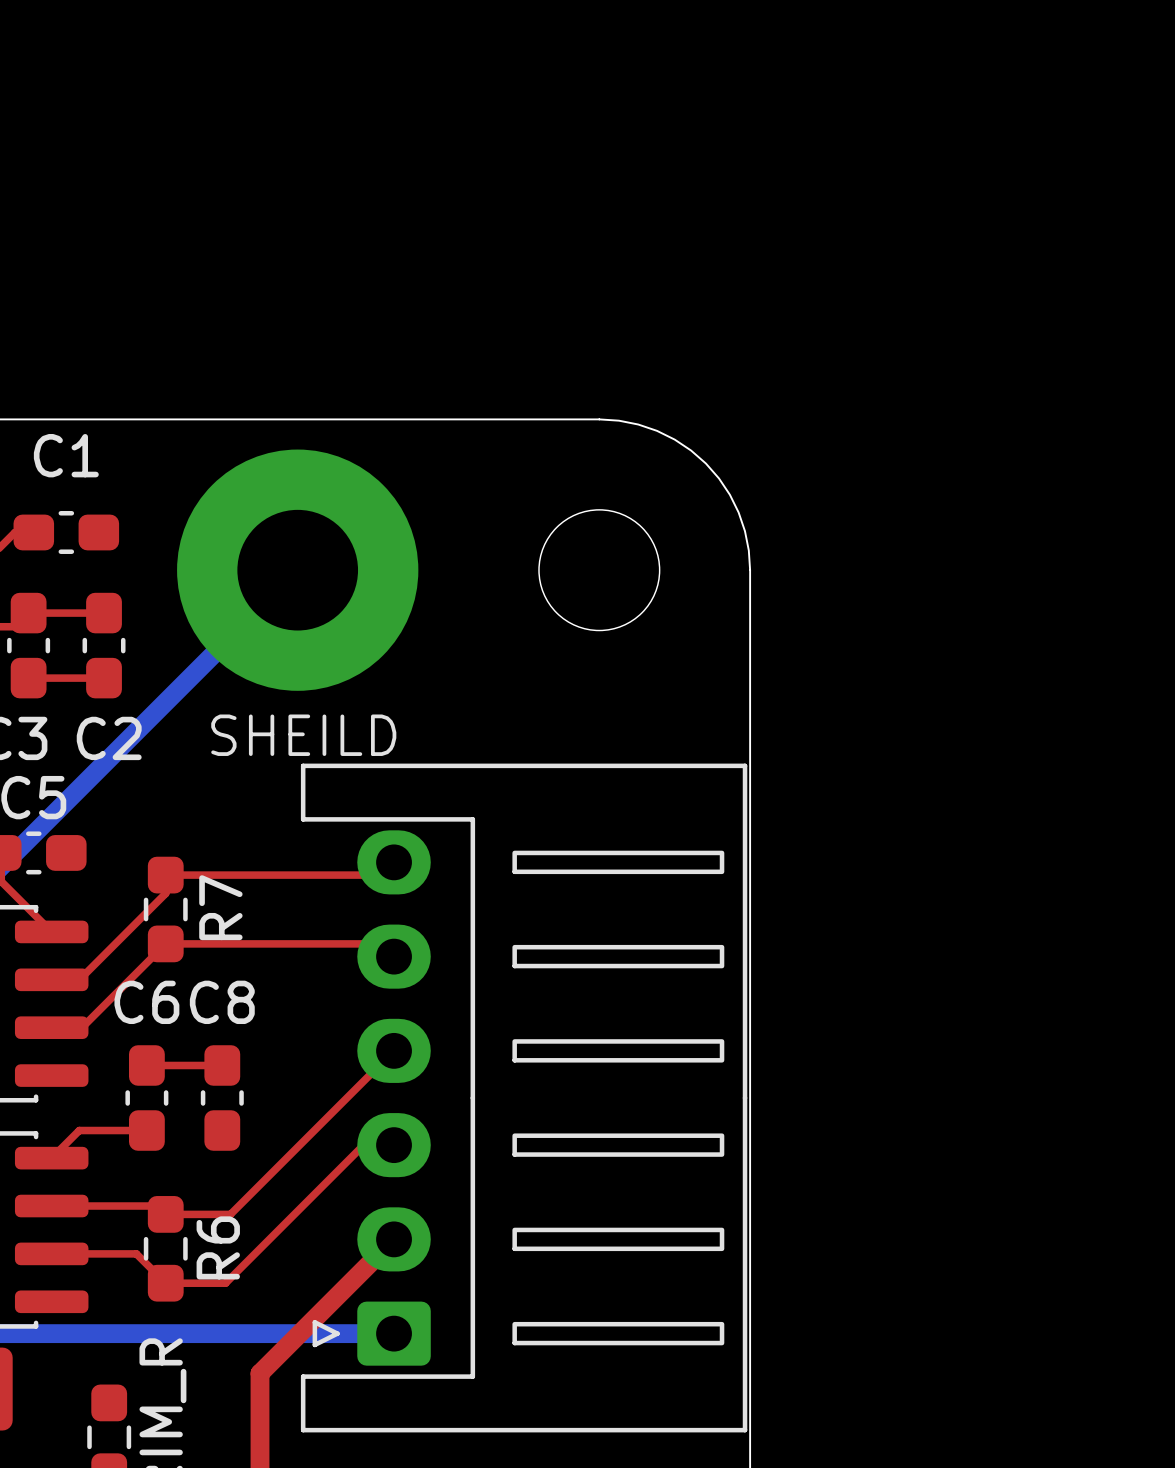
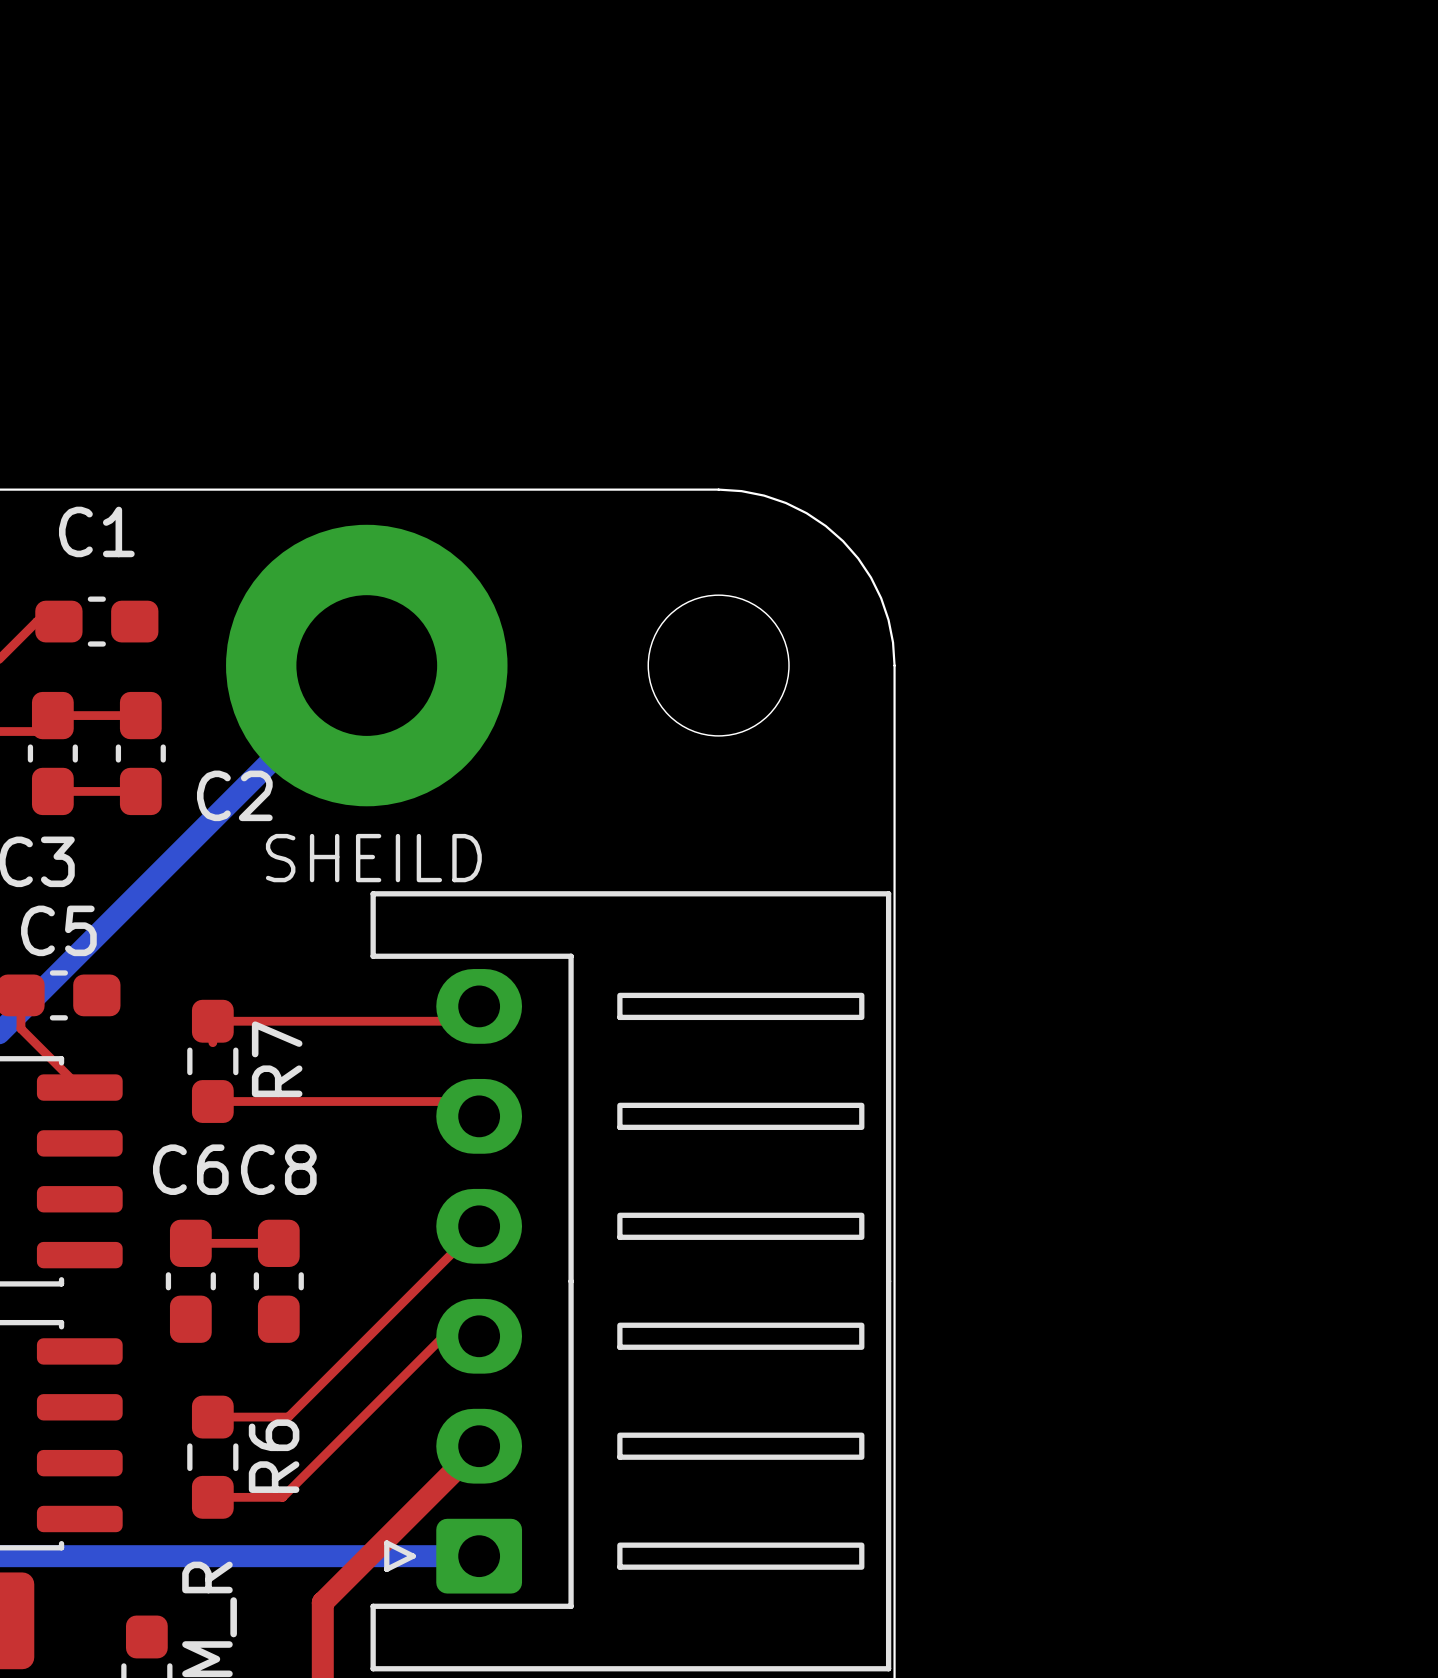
C2 name position: C2 (109, 738) -> C2 (234, 795)
top track: (165, 893) (79, 979) (51, 979) -> none
top track: (165, 943) (81, 1027) (51, 1027) -> none
top track: (146, 1130) (79, 1130) (51, 1158) -> none
top track: (51, 1206) (157, 1206) -> none
top track: (51, 1253) (136, 1253) (165, 1283) -> none

